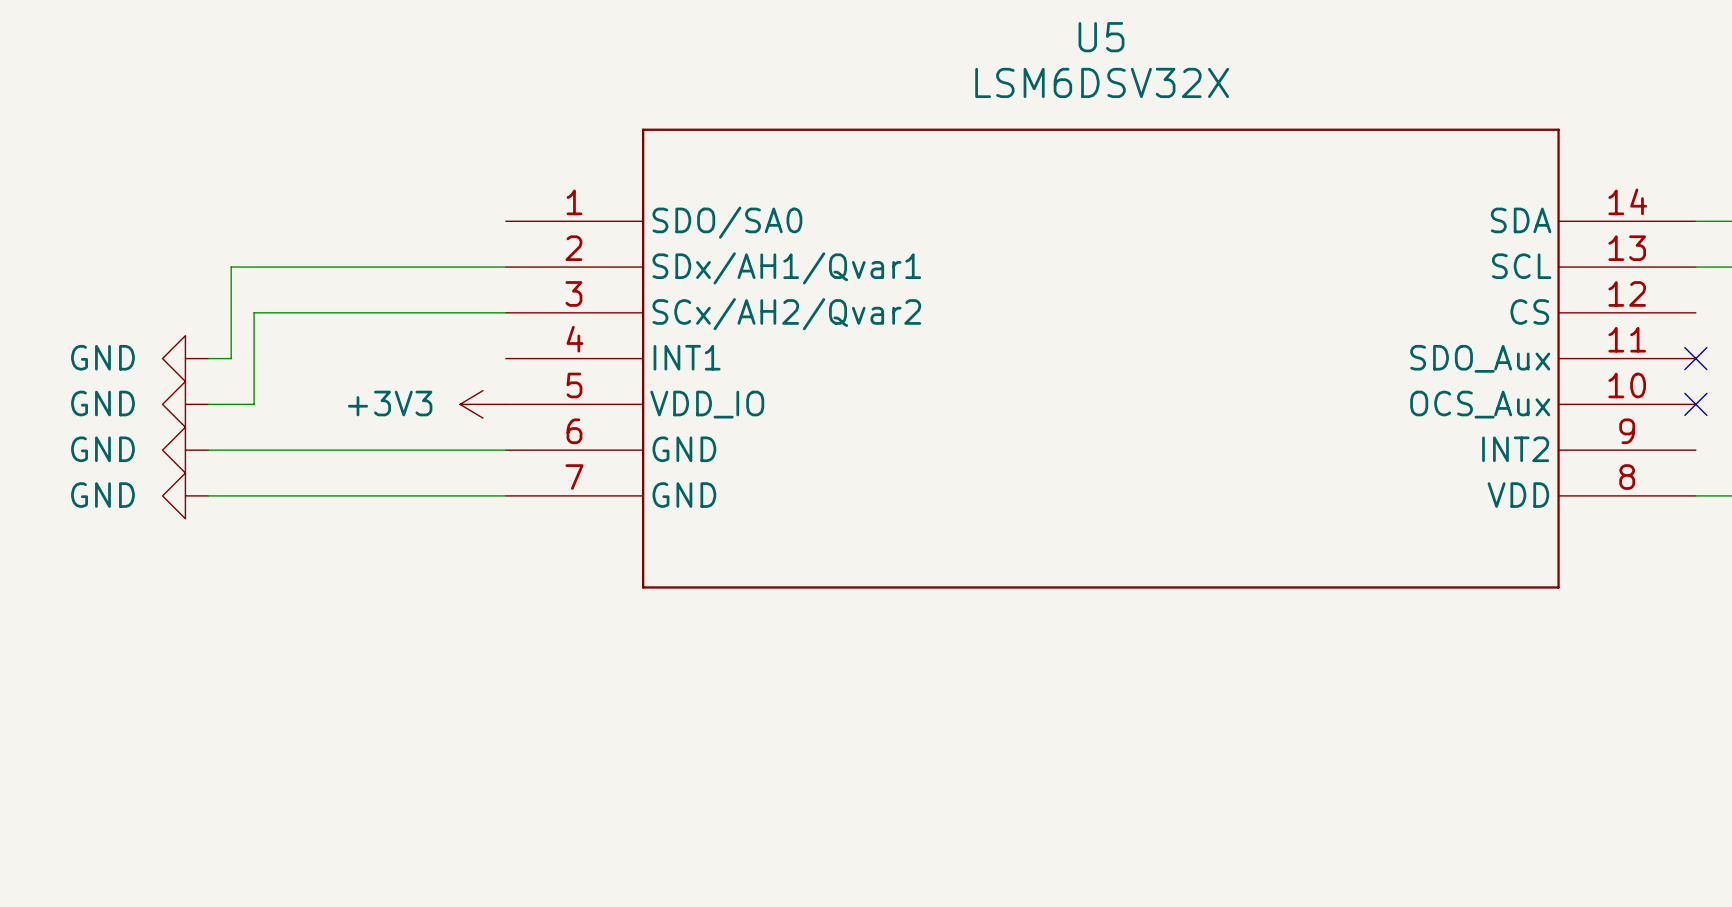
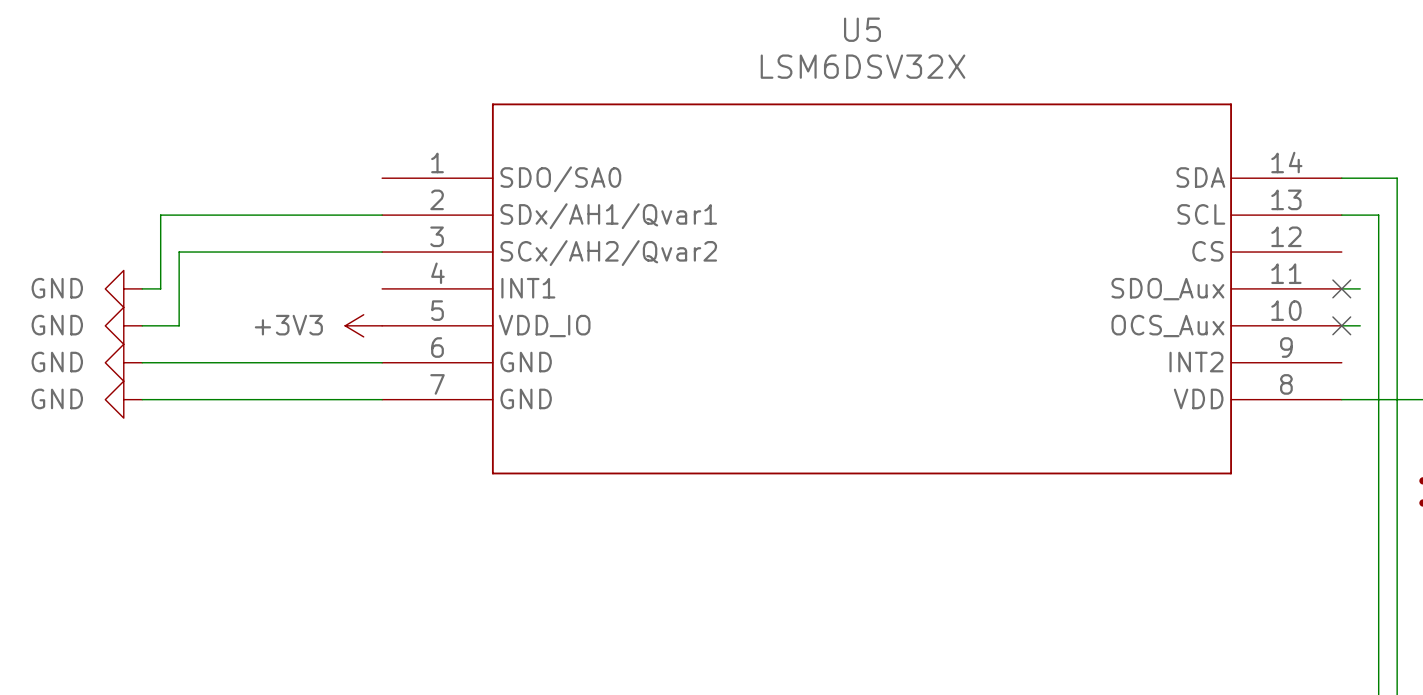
wire: none -> (1341, 288) (1360, 288)
wire: none -> (1341, 325) (1360, 325)

